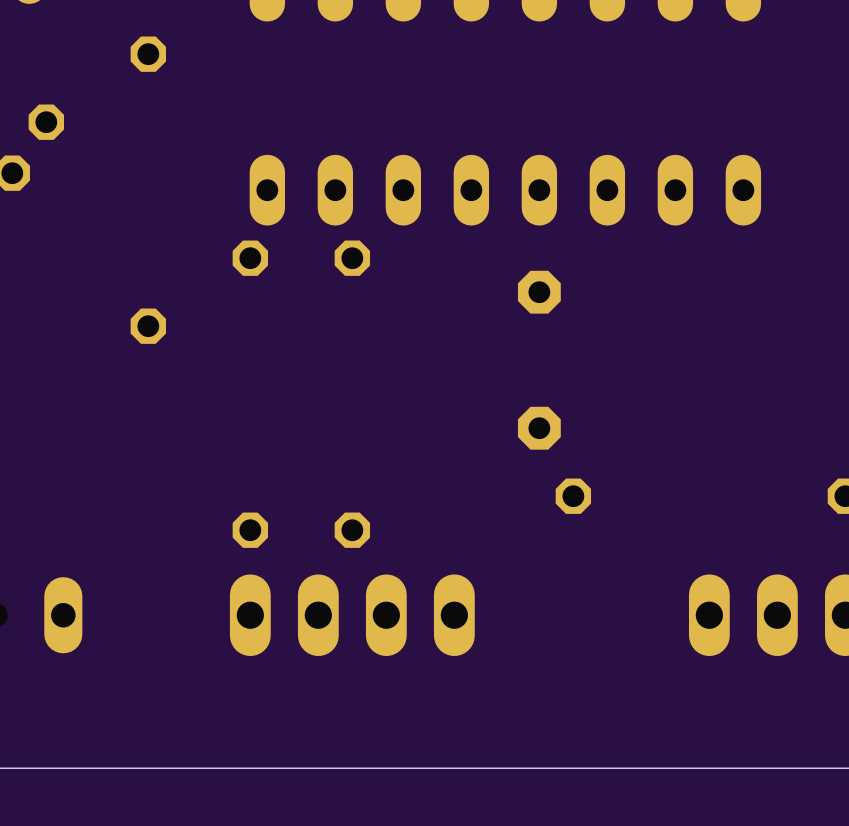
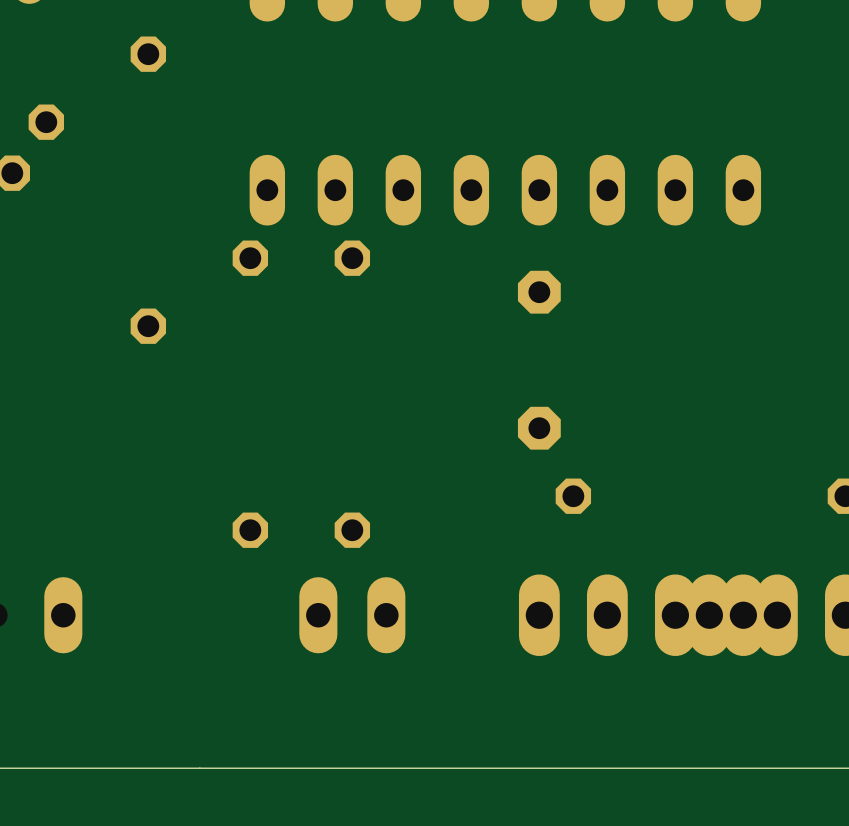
part footprint: [229, 574, 475, 657] -> [299, 577, 406, 654]
part: none -> (641, 615)

